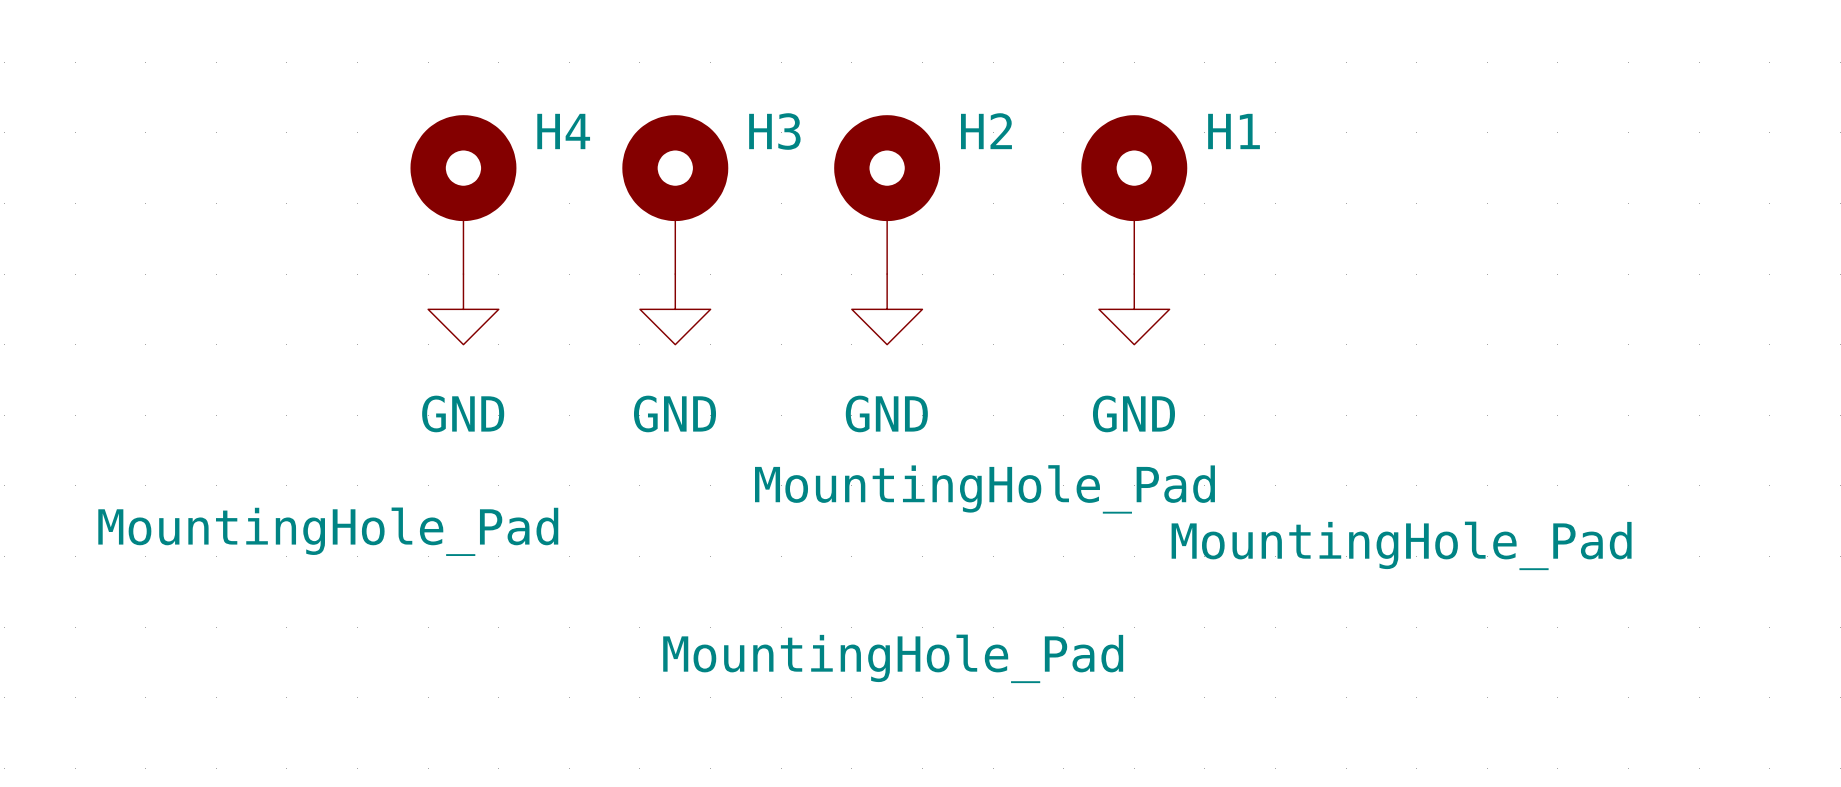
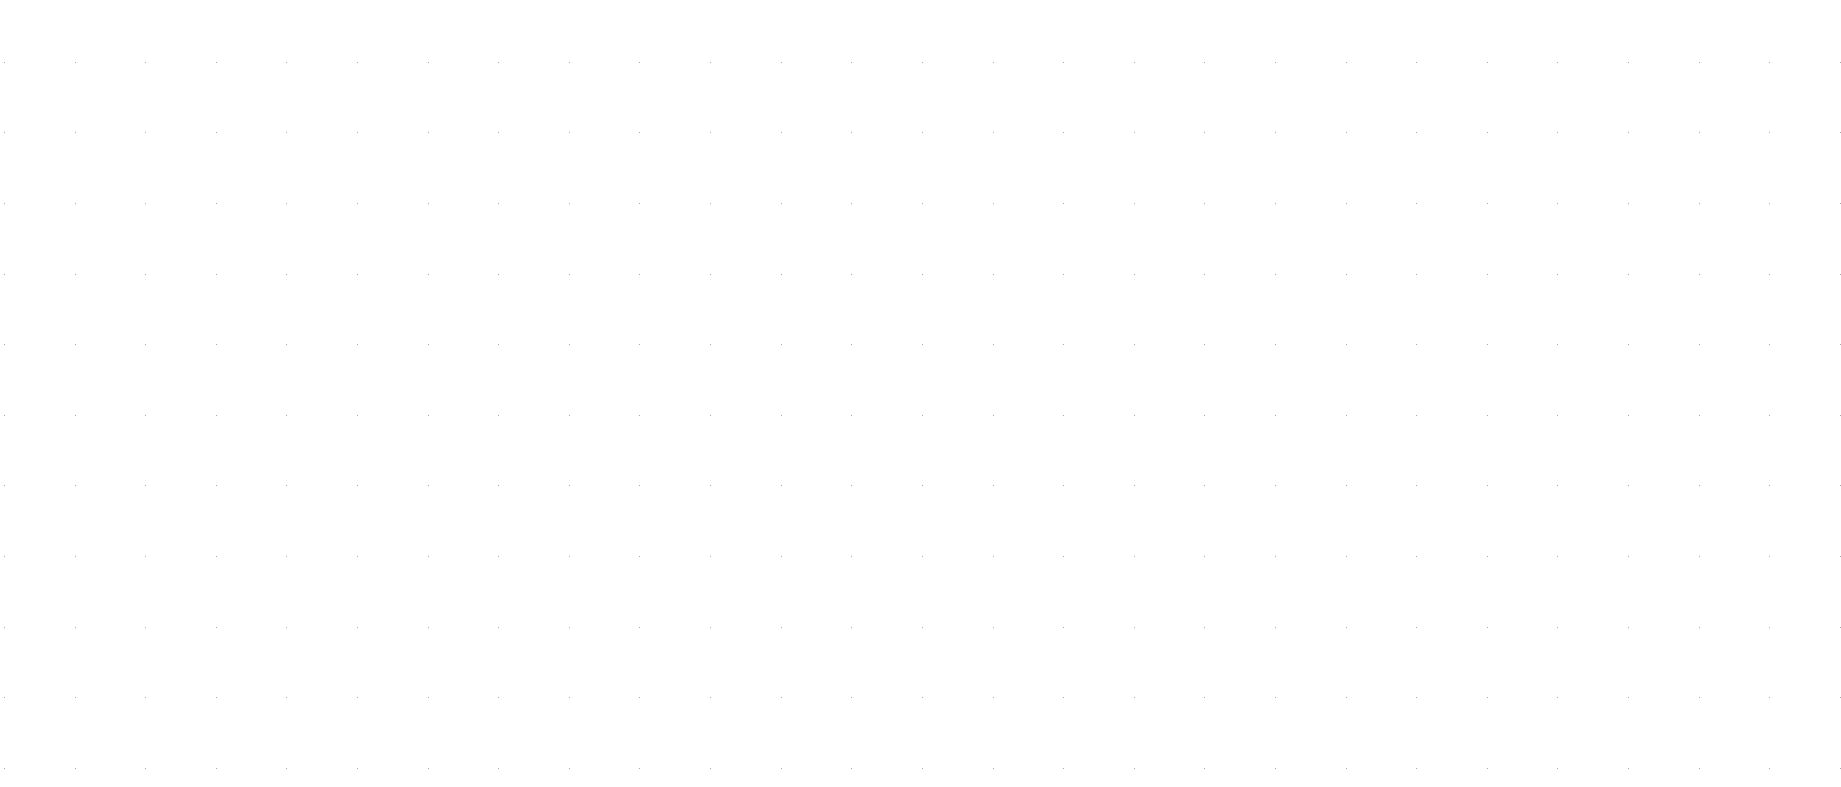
H4: MountingHole_Pad (463, 194) -> none
H3: MountingHole_Pad (675, 194) -> none
H2: MountingHole_Pad (887, 194) -> none
H1: MountingHole_Pad (1134, 194) -> none
power symbol: GND (463, 309) -> none
power symbol: GND (675, 309) -> none
power symbol: GND (887, 309) -> none
power symbol: GND (1134, 309) -> none

